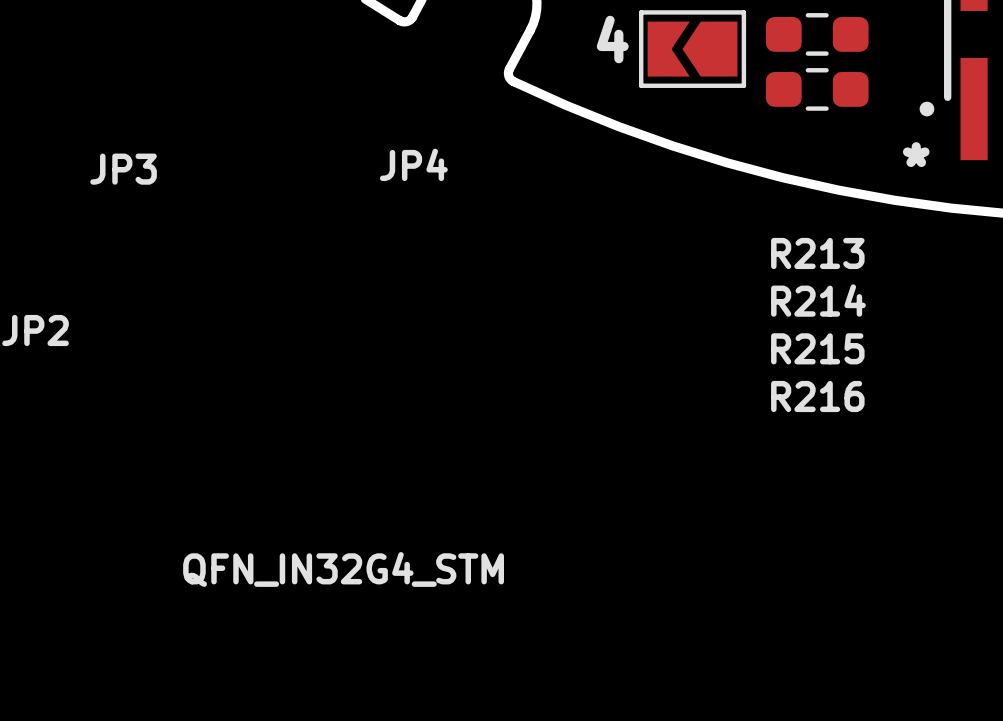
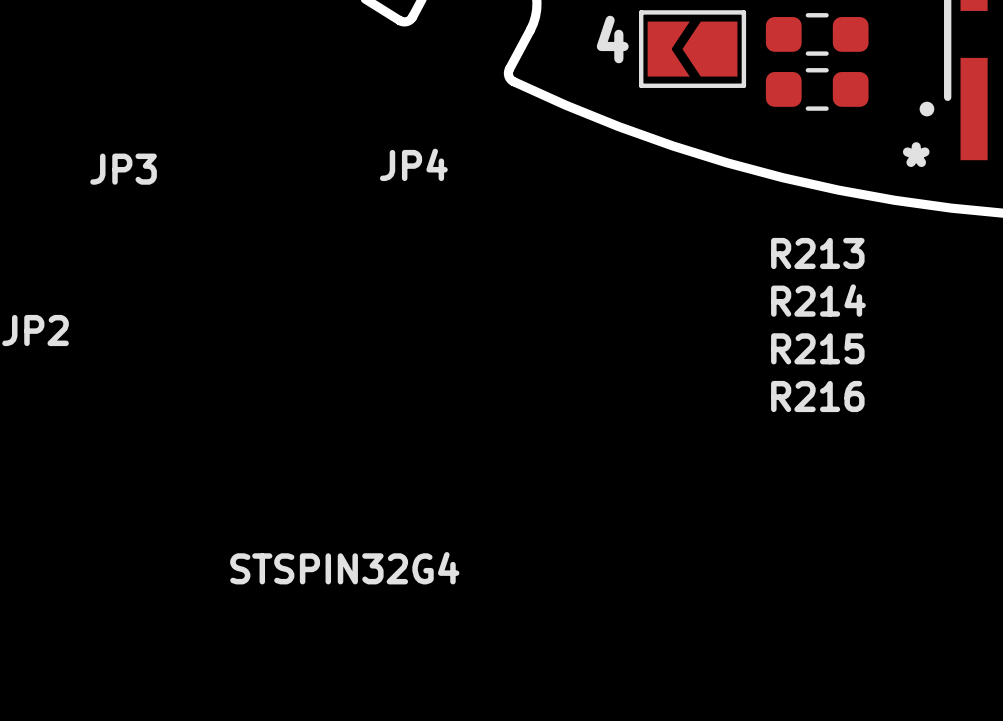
part value: QFN_IN32G4_STM (343, 569) -> STSPIN32G4 (344, 568)

